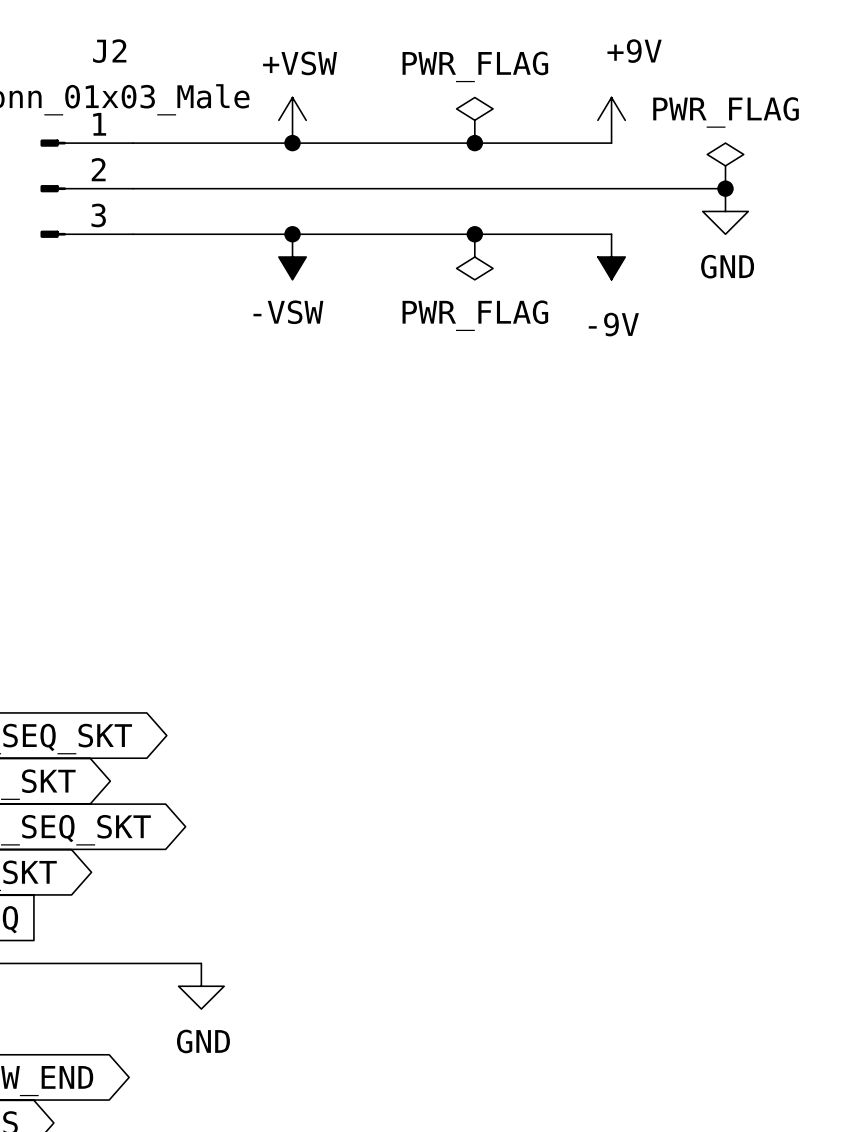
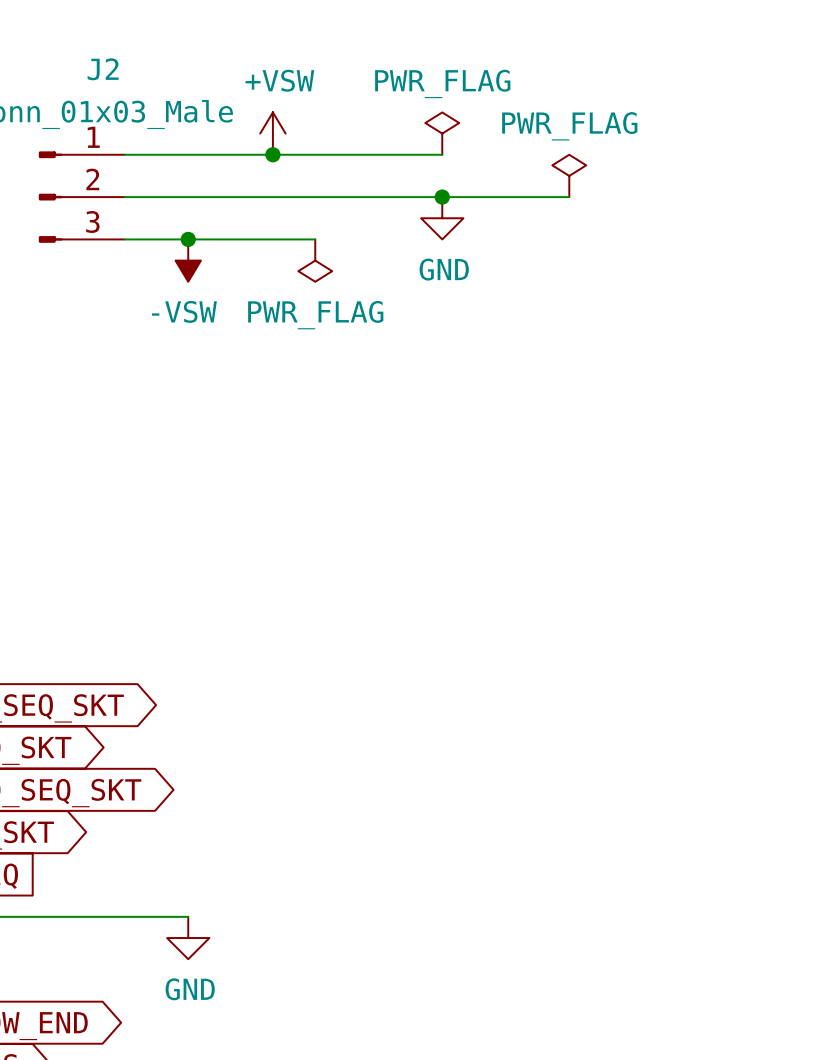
power symbol: +9V (611, 120) -> none
wire: (474, 143) (611, 143) -> none
junction: (474, 143) -> none
power symbol: none -> PWR_FLAG (569, 175)
power symbol: PWR_FLAG (725, 165) -> none
junction: none -> (442, 197)
wire: (611, 188) (725, 188) -> none
junction: (725, 188) -> none
power symbol position: GND (725, 211) -> GND (442, 218)
junction position: (292, 234) -> (188, 239)
wire: (338, 234) (611, 234) -> none
junction: (474, 234) -> none
power symbol position: -VSW (292, 257) -> -VSW (188, 260)
power symbol: none -> PWR_FLAG (315, 260)
power symbol: PWR_FLAG (474, 257) -> none
power symbol: -9V (611, 257) -> none

